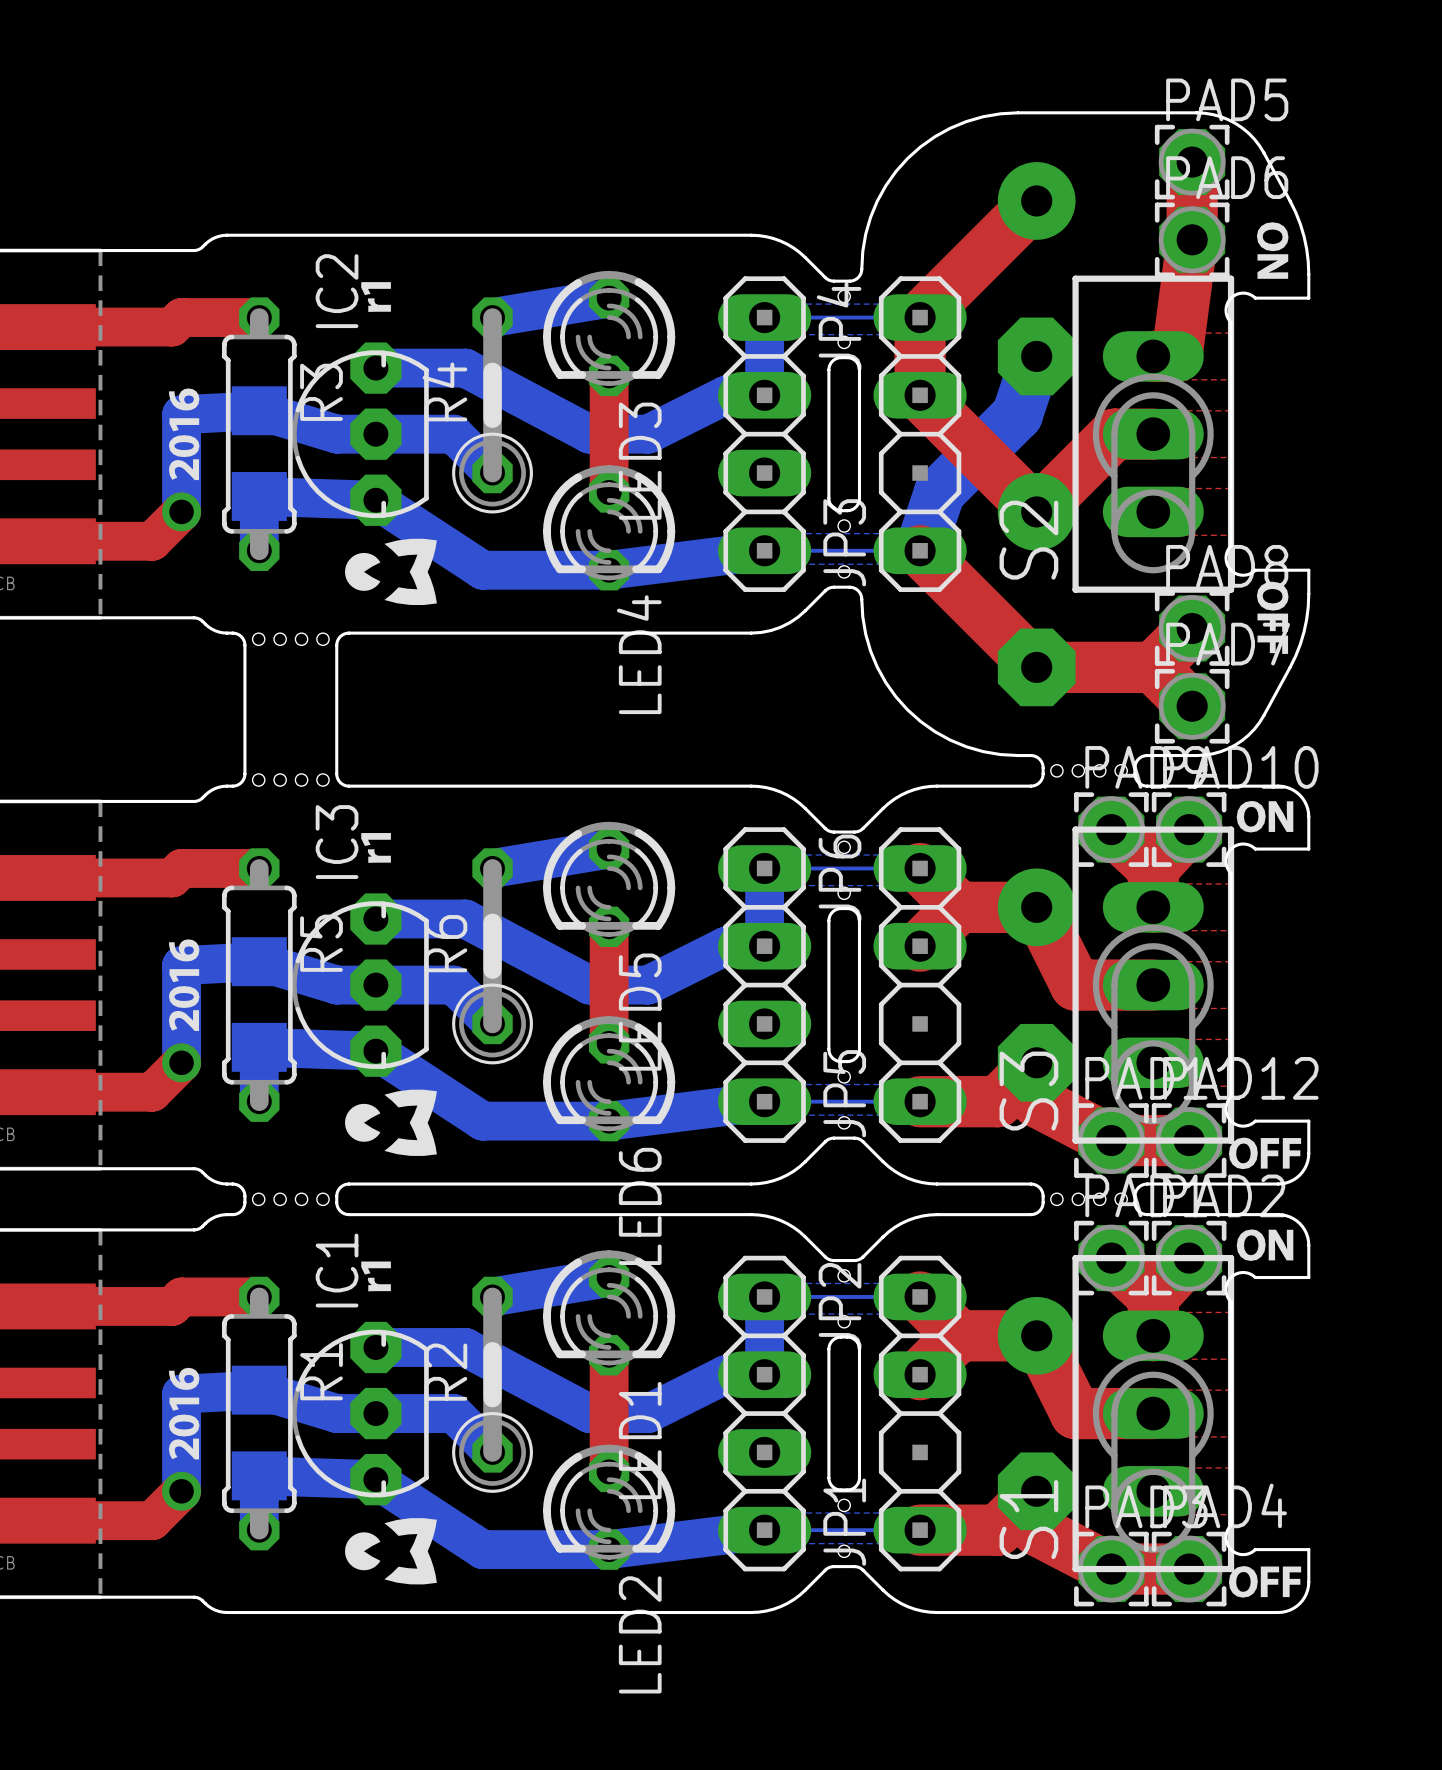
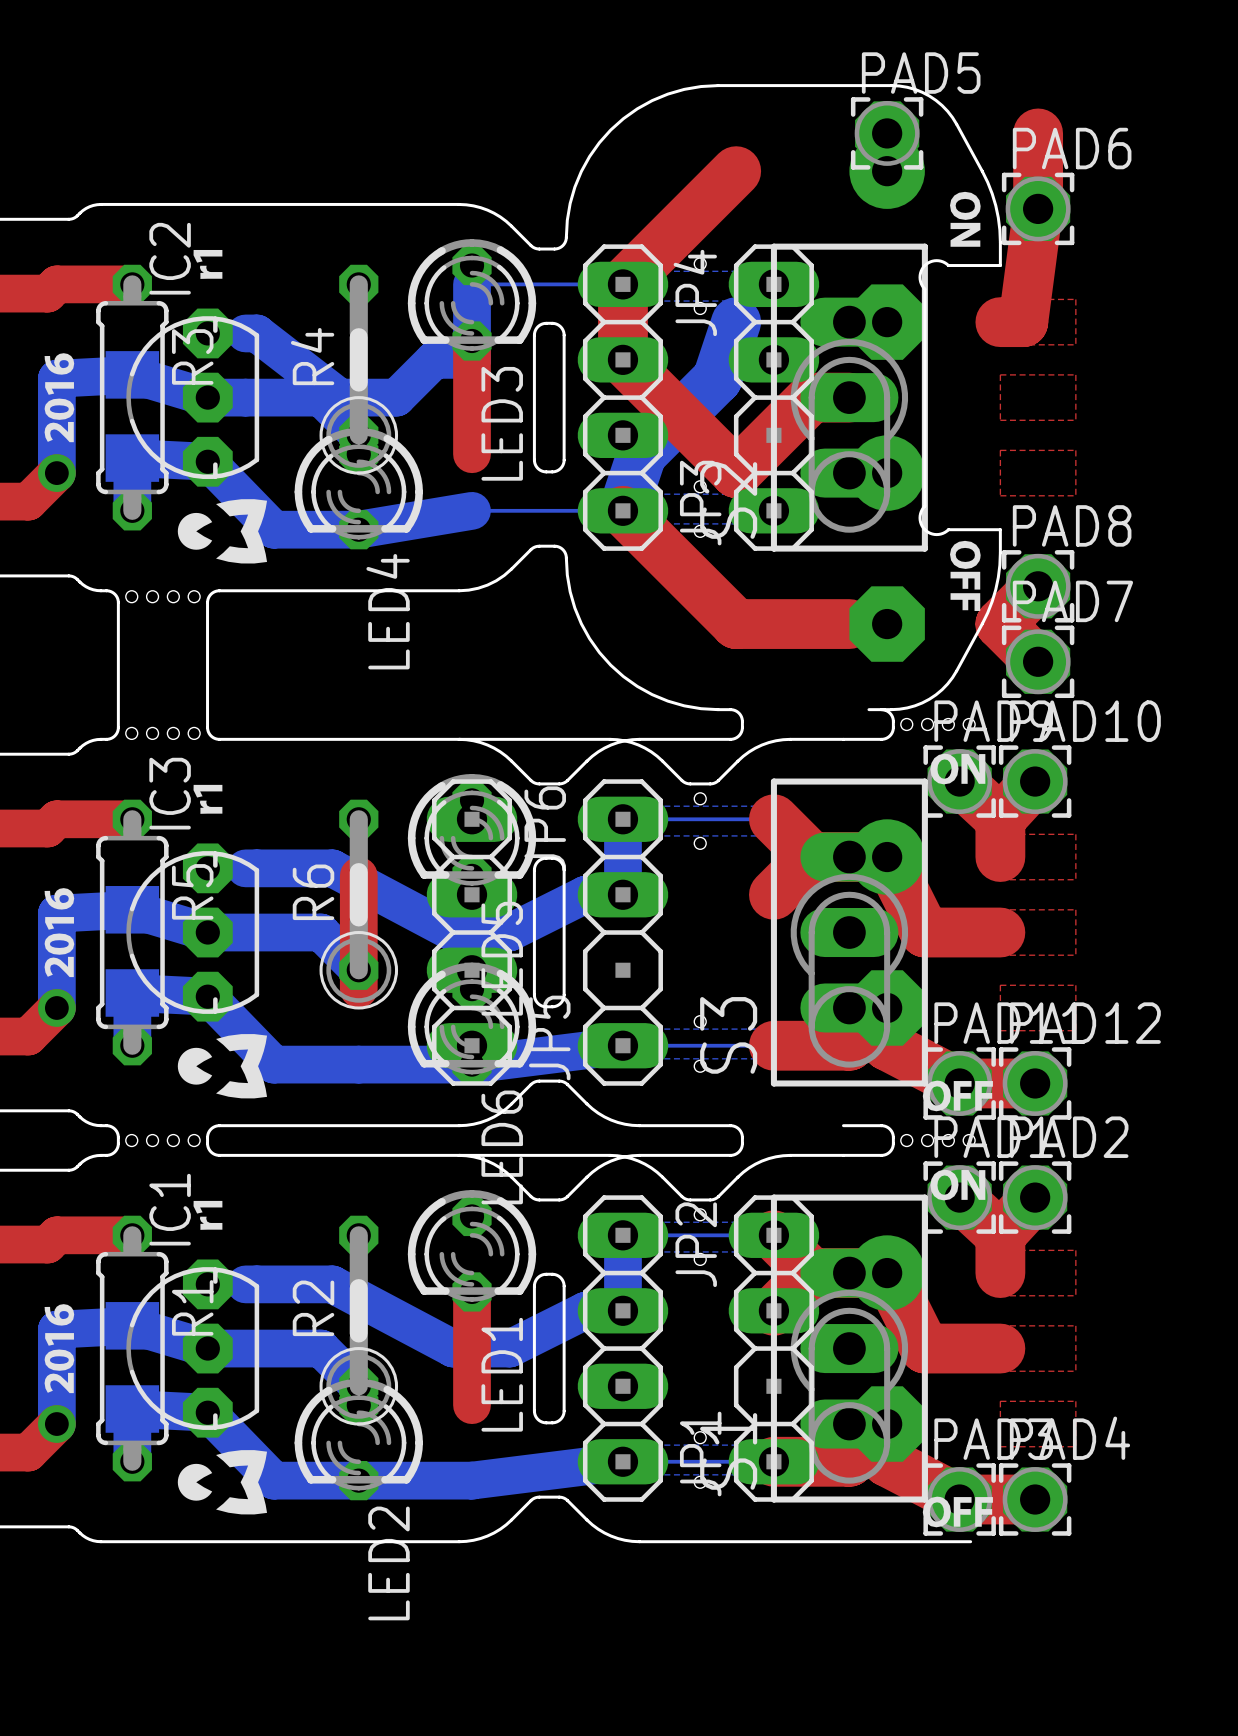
board edge: (1017, 112) (983, 116) (966, 121) (934, 136) (907, 158) (895, 171) (877, 201) (865, 234) (861, 272) (858, 277) (852, 280) (827, 279) (793, 248) (766, 236) (595, 235) -> (868, 85) (701, 86) (684, 89) (652, 100) (623, 118) (599, 142) (589, 156) (581, 171) (570, 203) (565, 241) (557, 248) (534, 248) (506, 221) (494, 213) (480, 207) (459, 204)
board edge: (1041, 112) (1204, 113) (1220, 116) (1235, 123) (1248, 133) (1259, 145) (1290, 200) (1304, 236) (1308, 261) (1308, 298) (1255, 298) (1249, 294) (1240, 293) (1231, 298) (1226, 310) (1231, 322) (1231, 545) (1226, 553) (1226, 562) (1231, 570) (1240, 575) (1249, 573) (1255, 570) (1308, 570) (1308, 606) (1300, 644) (1263, 715) (1254, 729) (1242, 740) (1220, 751) (1204, 755) (1144, 755) (1136, 761) (1134, 773) (1137, 781) (1145, 786) (1282, 786) (1296, 792) (1306, 805) (1308, 816) (1308, 849) (1255, 849) (1249, 845) (1240, 844) (1231, 849) (1226, 856) (1226, 865) (1231, 873) (1231, 1096) (1226, 1108) (1231, 1121) (1240, 1126) (1249, 1124) (1255, 1121) (1308, 1121) (1308, 1157) (1302, 1172) (1296, 1177) (1286, 1182) (1145, 1184) (1136, 1190) (1134, 1202) (1137, 1209) (1145, 1214) (1282, 1214) (1296, 1220) (1306, 1233) (1308, 1245) (1308, 1277) (1255, 1277) (1249, 1273) (1240, 1272) (1231, 1277) (1226, 1285) (1226, 1294) (1231, 1301) (1231, 1525) (1226, 1537) (1231, 1549) (1240, 1554) (1249, 1553) (1255, 1549) (1308, 1549) (1308, 1585) (1306, 1593) (1299, 1603) (1289, 1610) (1282, 1612) (1122, 1612) -> (891, 85) (907, 87) (922, 92) (936, 100) (947, 111) (982, 171) (995, 205) (999, 229) (1000, 265) (948, 265) (943, 261) (934, 260) (924, 265) (920, 272) (920, 281) (924, 289) (924, 506) (920, 517) (924, 529) (934, 534) (943, 533) (948, 529) (1000, 529) (1000, 552) (998, 577) (992, 601) (982, 624) (952, 677) (942, 689) (922, 702) (907, 707) (881, 709)
PAD5 position: (1192, 162) -> (887, 133)
top track: (1036, 200) (920, 317) (920, 395) (1036, 511) (1114, 434) (1153, 434) -> (736, 171) (622, 284) (622, 359) (736, 473) (811, 397) (849, 397)
drawing position: (1272, 250) -> (965, 219)
drawing position: (376, 297) -> (207, 264)
bottom track: (609, 298) (492, 317) -> none
bottom track: (920, 317) (764, 317) (764, 395) (725, 395) (648, 434) (589, 434) (465, 368) (387, 368) -> (622, 284) (472, 284) (472, 359) (434, 359) (396, 397) (339, 397) (256, 333)
bottom track: (1036, 356) (1017, 414) (939, 492) (920, 550) (764, 550) (609, 570) (492, 570) -> (736, 322) (717, 378) (641, 454) (622, 510) (472, 510) (358, 529)
board edge: (841, 357) (853, 359) (857, 363) (859, 369) (859, 500) (854, 508) (847, 510) (835, 509) (830, 504) (828, 498) (828, 368) (833, 360) (841, 357) -> (546, 323) (558, 324) (562, 329) (564, 335) (564, 461) (559, 469) (552, 471) (540, 470) (536, 465) (534, 460) (534, 333) (539, 325) (546, 323)
IC2 position: (360, 434) -> (192, 397)
S2 position: (1153, 434) -> (849, 397)
bottom track: (259, 496) (375, 500) (482, 570) -> (132, 458) (207, 461) (273, 529) (349, 529)
LED4 position: (609, 527) -> (358, 488)
top track: (920, 550) (1036, 667) (1153, 667) -> (622, 510) (736, 624) (849, 624)
drawing position: (390, 571) -> (222, 531)
drawing position: (1272, 617) -> (965, 575)
board edge: (595, 633) (761, 632) (789, 622) (829, 588) (852, 587) (858, 590) (861, 596) (865, 634) (877, 667) (895, 696) (907, 709) (934, 731) (966, 746) (983, 751) (1017, 755) -> (459, 590) (478, 588) (496, 580) (534, 547) (559, 547) (565, 554) (570, 591) (581, 623) (599, 652) (610, 665) (623, 676) (652, 694) (684, 705) (733, 710) (739, 714) (742, 721) (740, 733) (732, 739) (639, 739) (617, 742) (598, 751) (566, 781) (559, 783) (534, 783) (506, 756) (494, 748) (480, 742) (459, 739)
drawing position: (1265, 816) -> (957, 769)
drawing position: (376, 847) -> (207, 799)
bottom track: (609, 849) (492, 868) -> none
board edge: (841, 908) (853, 910) (857, 914) (859, 920) (859, 1050) (854, 1059) (847, 1061) (835, 1059) (830, 1055) (828, 1049) (828, 919) (833, 911) (841, 908) -> (546, 858) (558, 859) (562, 864) (564, 870) (564, 996) (559, 1004) (552, 1006) (540, 1005) (536, 1000) (534, 994) (534, 868) (539, 860) (546, 858)
top track: (609, 926) (609, 1043) -> (358, 875) (358, 989)
IC3 position: (360, 985) -> (192, 932)
JP6 position: (764, 985) -> (472, 932)
JP5 position: (920, 985) -> (622, 932)
S3 position: (1153, 985) -> (849, 932)
bottom track: (259, 1047) (375, 1051) (482, 1121) -> (132, 992) (207, 996) (273, 1064) (349, 1064)
drawing position: (390, 1122) -> (222, 1066)
drawing position: (1265, 1153) -> (957, 1095)
board edge: (595, 1184) (766, 1182) (793, 1171) (826, 1140) (833, 1138) (860, 1139) (888, 1166) (914, 1180) (937, 1184) (991, 1184) -> (459, 1125) (480, 1122) (494, 1116) (506, 1108) (534, 1082) (559, 1081) (566, 1083) (598, 1113) (617, 1122) (639, 1125) (732, 1125) (739, 1130) (742, 1137) (740, 1149) (732, 1155) (639, 1155) (617, 1158) (598, 1167) (566, 1197) (559, 1199) (534, 1199) (506, 1172) (494, 1164) (480, 1158) (459, 1155)
drawing position: (1265, 1245) -> (957, 1185)
drawing position: (376, 1276) -> (207, 1215)
bottom track: (609, 1277) (492, 1296) -> none
board edge: (841, 1337) (853, 1338) (857, 1343) (859, 1349) (859, 1479) (854, 1487) (847, 1490) (835, 1488) (830, 1483) (828, 1477) (828, 1347) (833, 1339) (841, 1337) -> (546, 1274) (558, 1275) (562, 1280) (564, 1286) (564, 1412) (559, 1420) (552, 1422) (540, 1421) (536, 1416) (534, 1410) (534, 1284) (539, 1276) (546, 1274)
IC1 position: (360, 1413) -> (192, 1348)
S1 position: (1153, 1413) -> (849, 1348)
bottom track: (259, 1475) (375, 1479) (482, 1549) -> (132, 1409) (207, 1412) (273, 1480) (349, 1480)
LED2 position: (609, 1507) -> (358, 1439)
drawing position: (390, 1551) -> (222, 1482)
drawing position: (1265, 1581) -> (957, 1511)
board edge: (595, 1612) (766, 1611) (793, 1599) (826, 1569) (833, 1566) (859, 1567) (888, 1595) (901, 1603) (914, 1609) (937, 1612) -> (459, 1541) (480, 1538) (494, 1532) (506, 1524) (532, 1499) (539, 1497) (565, 1498) (598, 1529) (624, 1540) (790, 1541)

